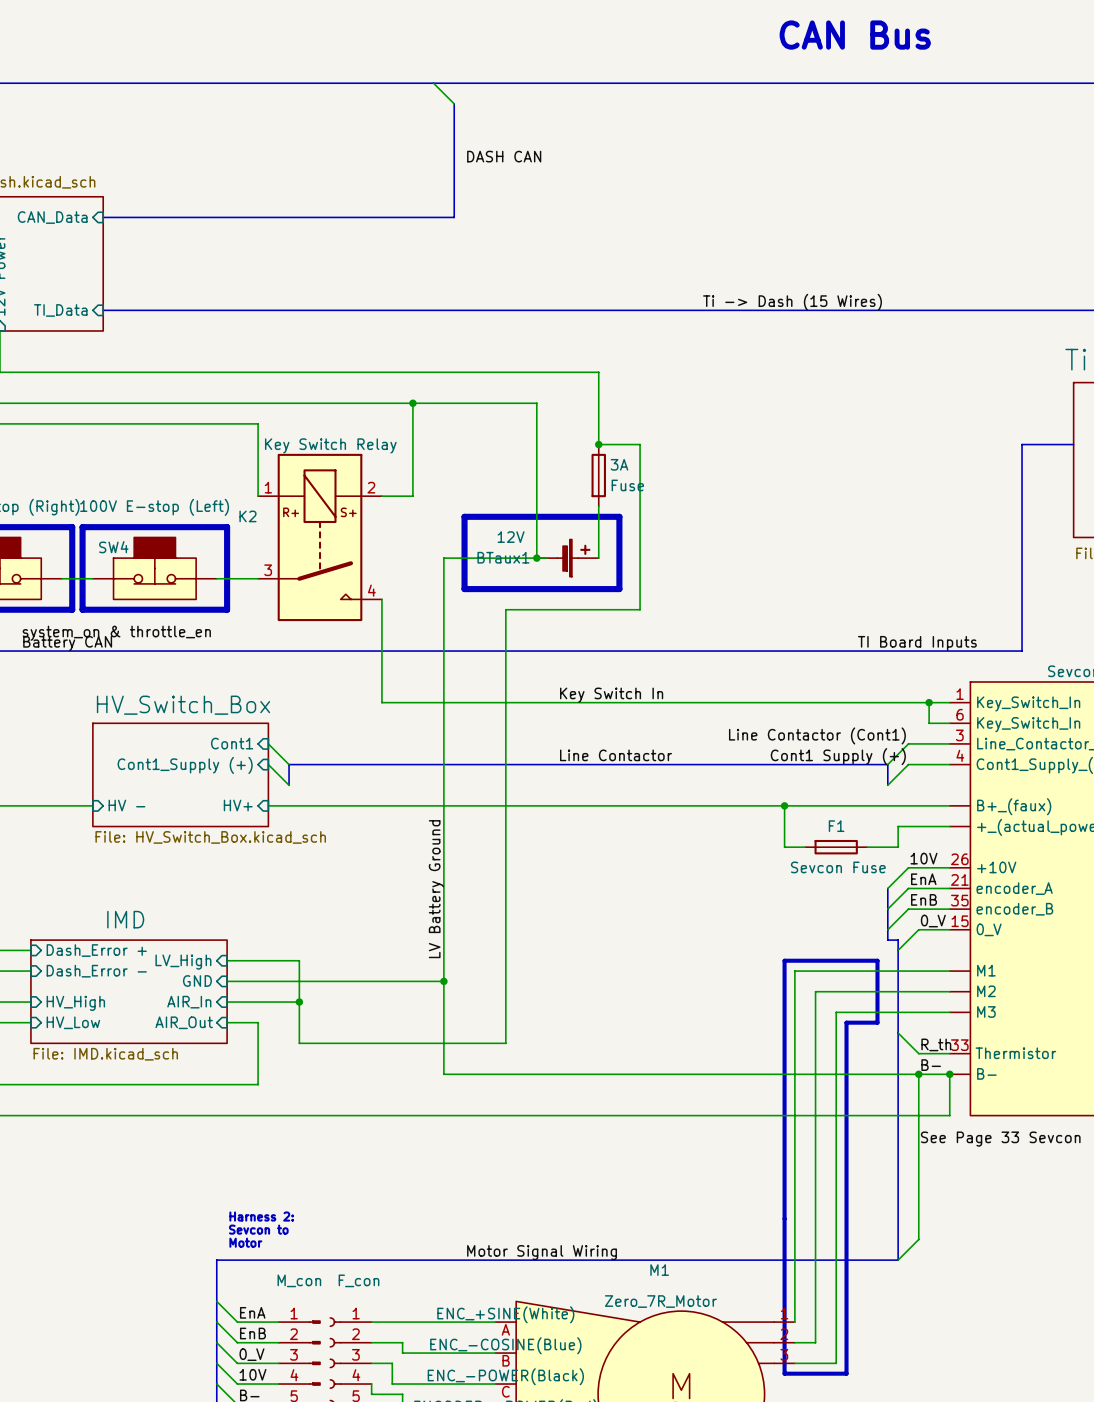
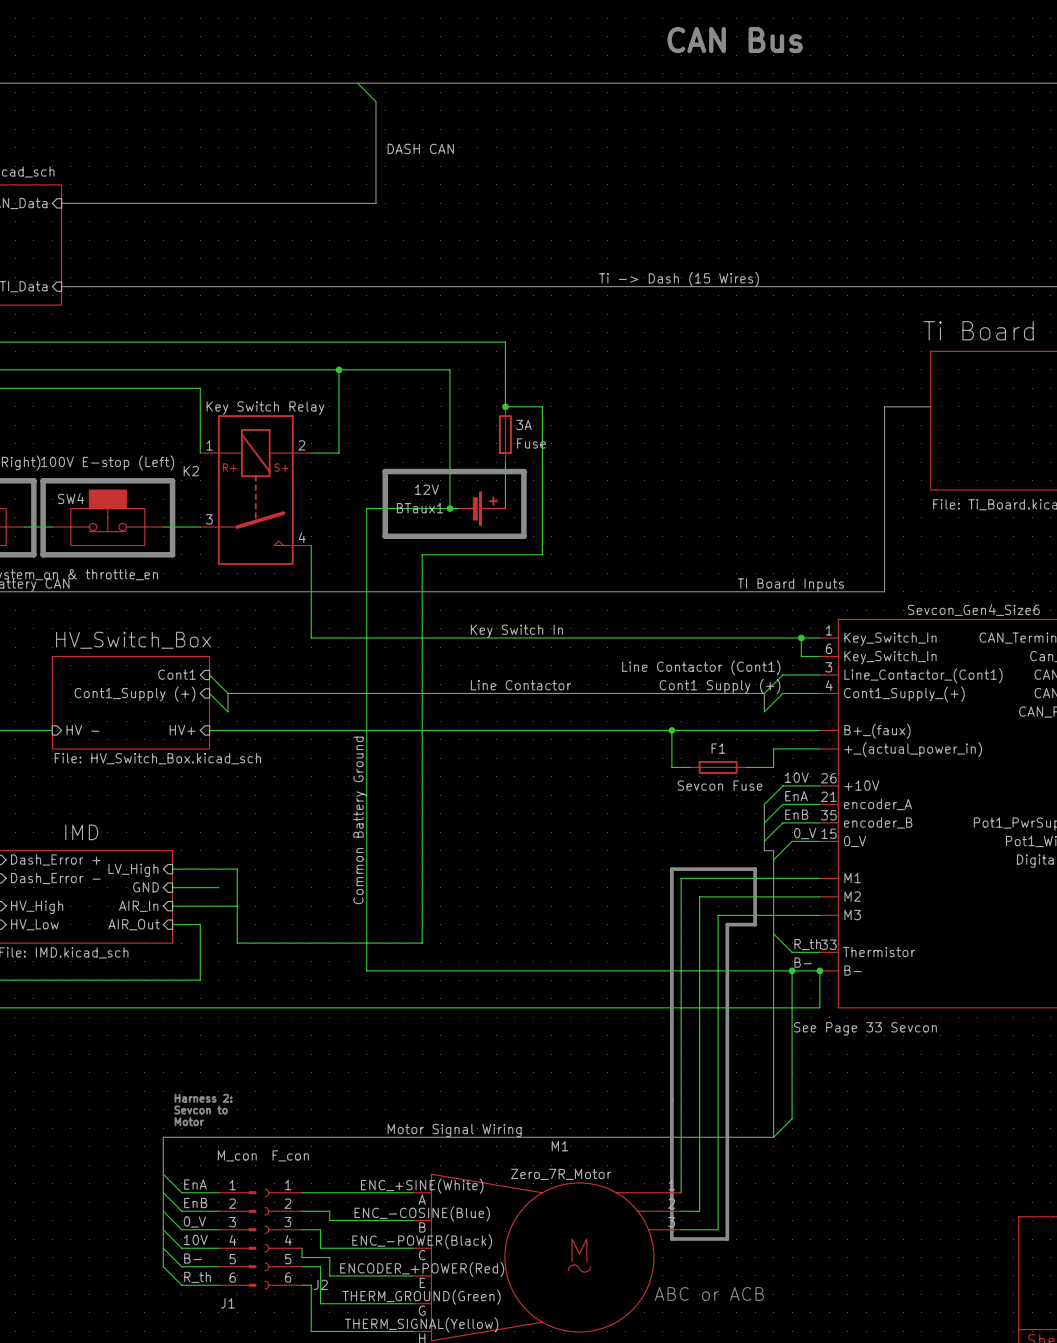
label: LV Battery Ground (436, 889) -> Common Battery Ground (360, 820)
wire: (278, 981) (443, 981) -> none
junction: (443, 981) -> none
junction: (299, 1002) -> none

